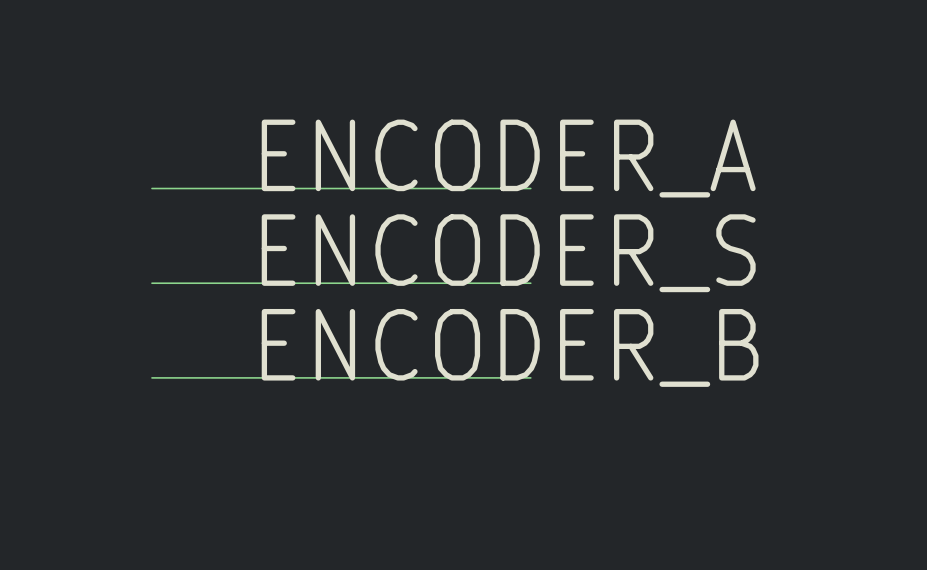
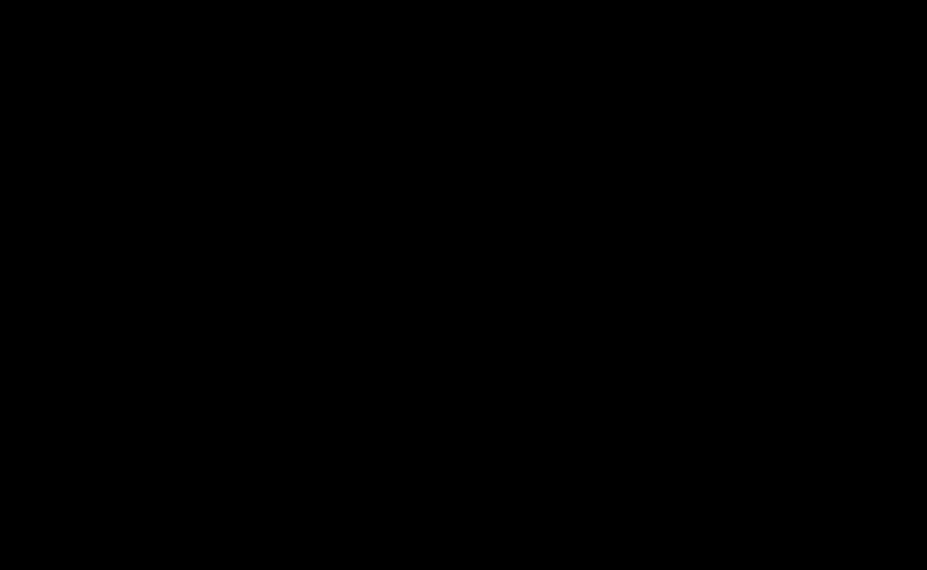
label: ENCODER_A (508, 158) -> none
wire: (151, 188) (530, 188) -> none
label: ENCODER_S (508, 253) -> none
wire: (151, 283) (530, 283) -> none
label: ENCODER_B (510, 347) -> none
wire: (151, 377) (530, 377) -> none

